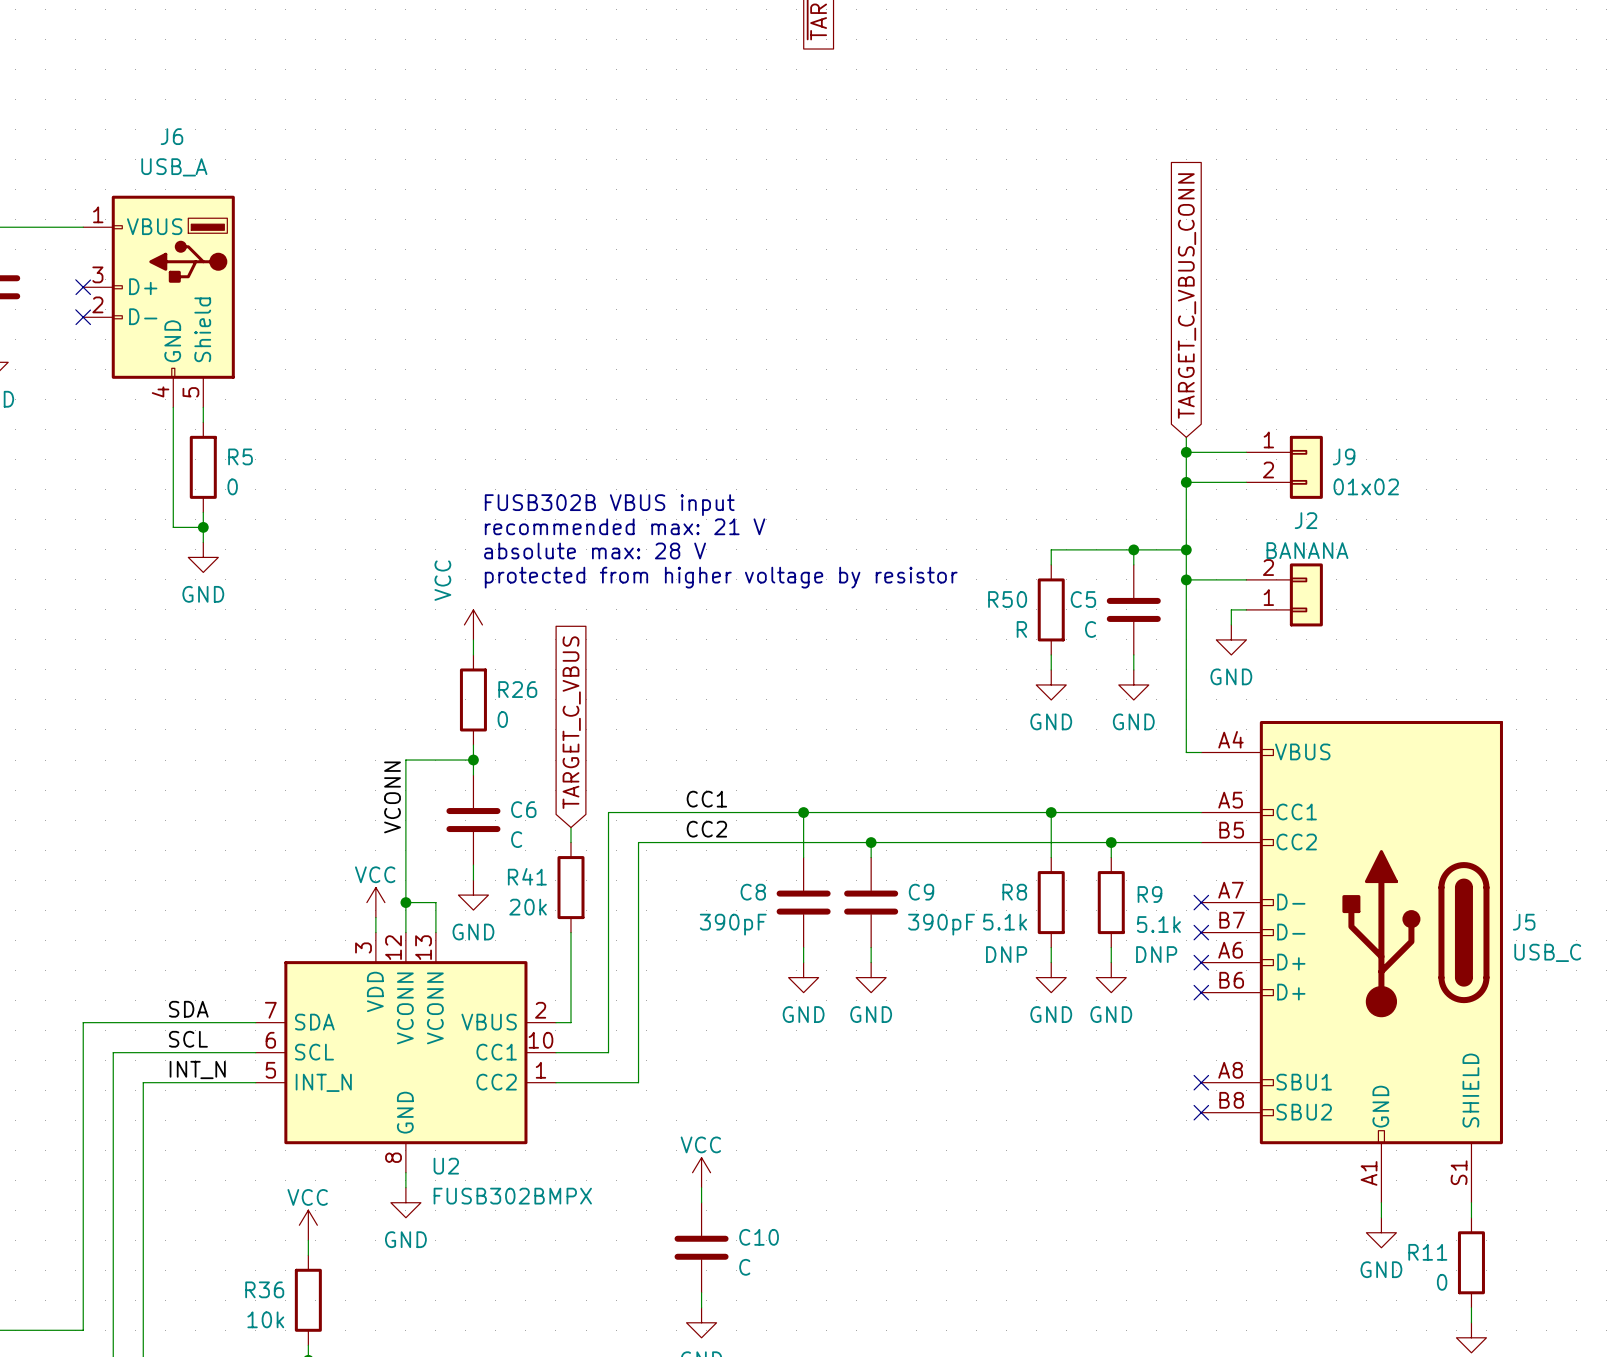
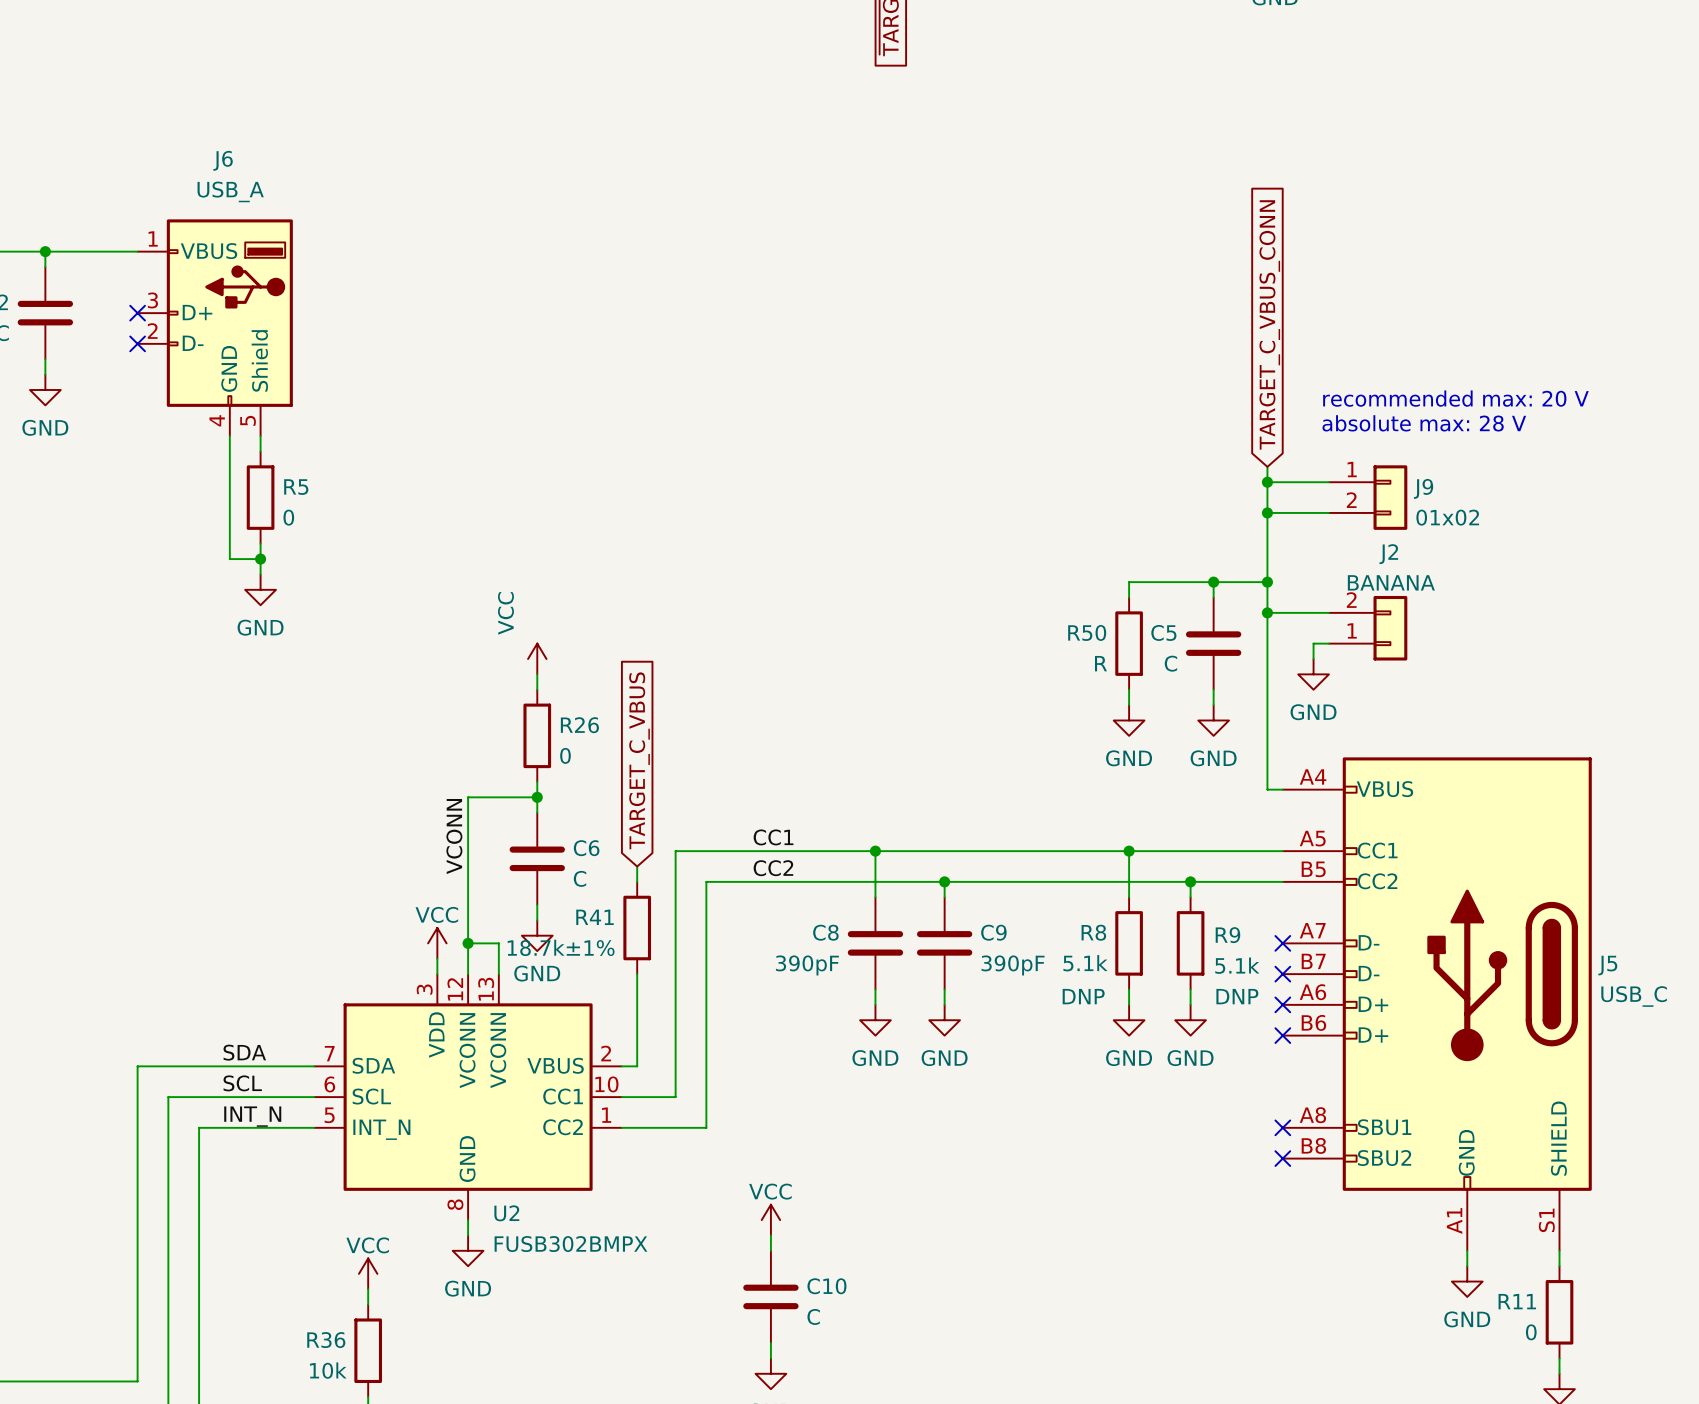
text: none -> recommended max: 20 V (1455, 398)
text: none -> absolute max: 28 V (1424, 423)
text: FUSB302B VBUS input (609, 505) -> none
text: recommended max: 21 V (625, 526) -> none
text: absolute max: 28 V (595, 550) -> none
text: protected from higher voltage by resistor (721, 577) -> none
R41 value: 20k (528, 907) -> 18.7k±1% (561, 947)

